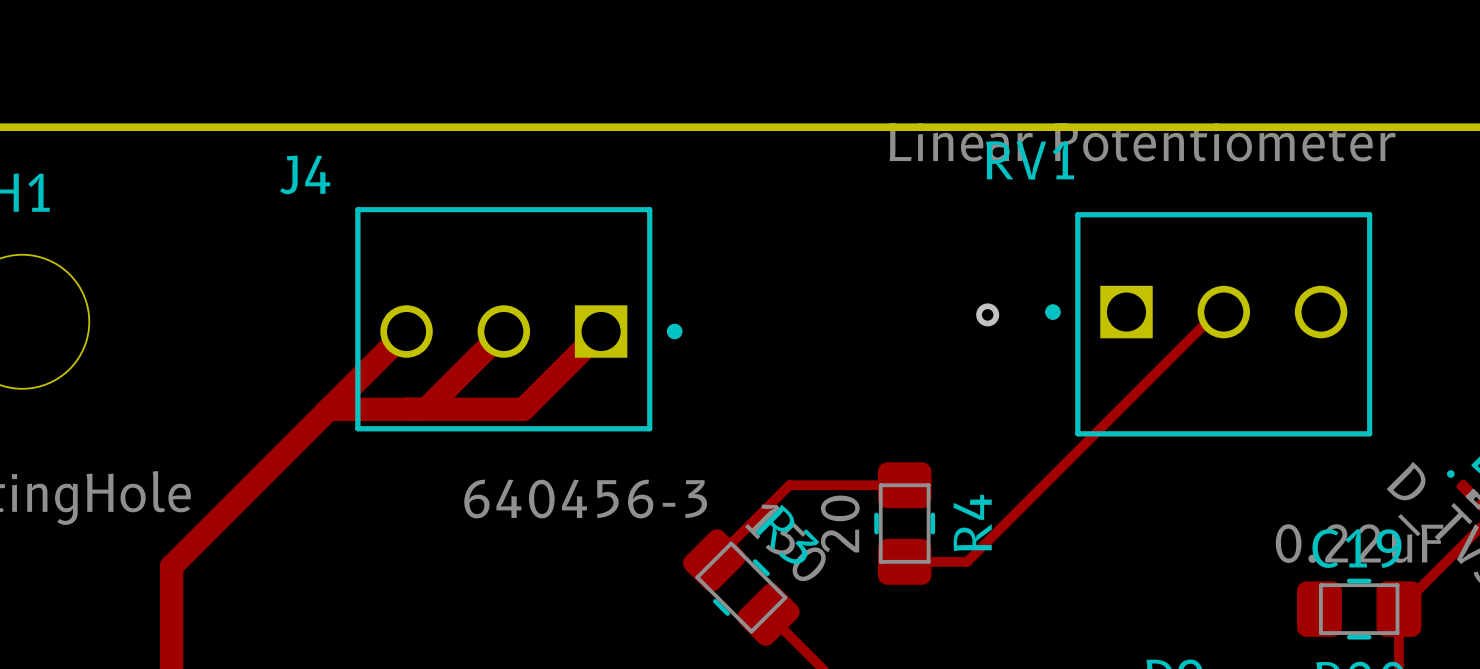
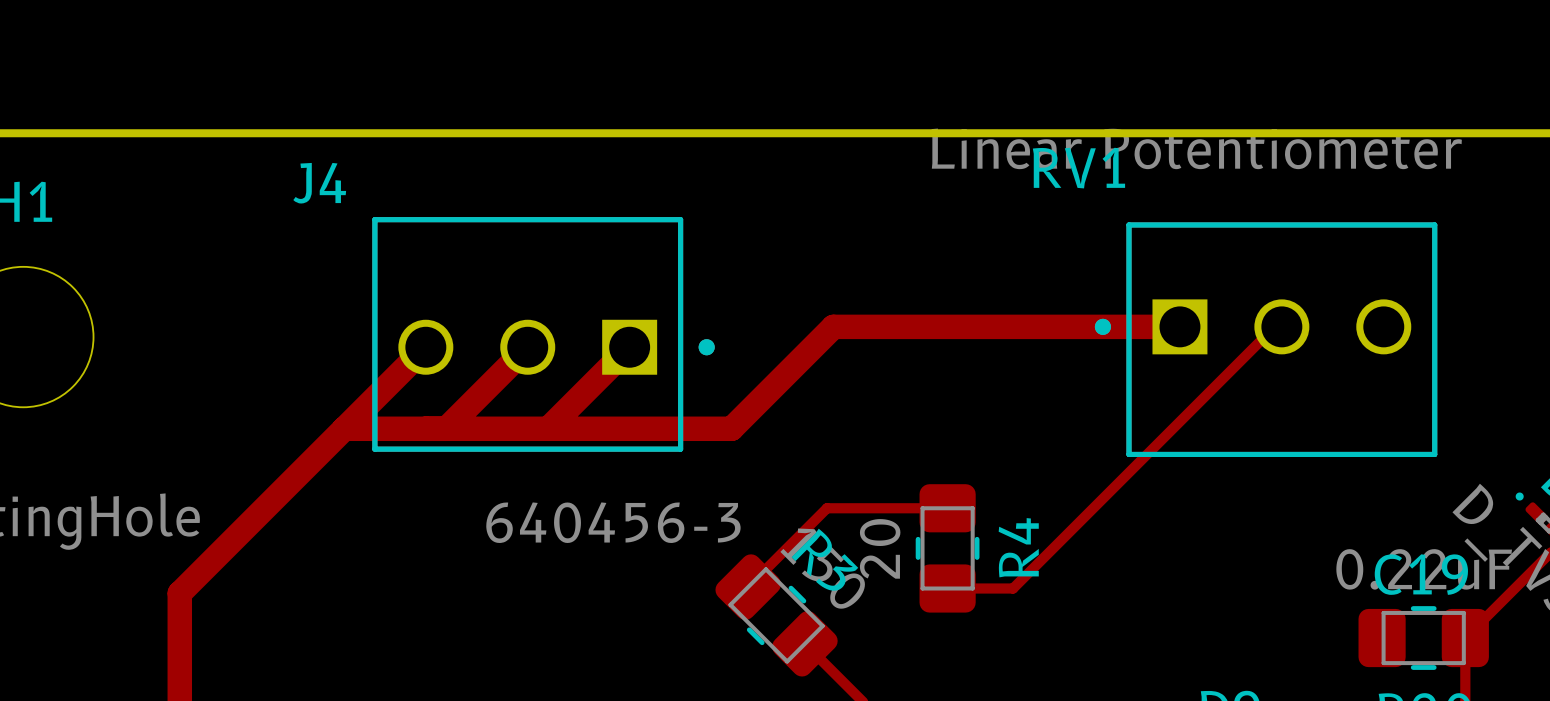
track: none -> (1179, 326) (833, 326) (731, 428) (548, 428)
via: (987, 314) -> none

